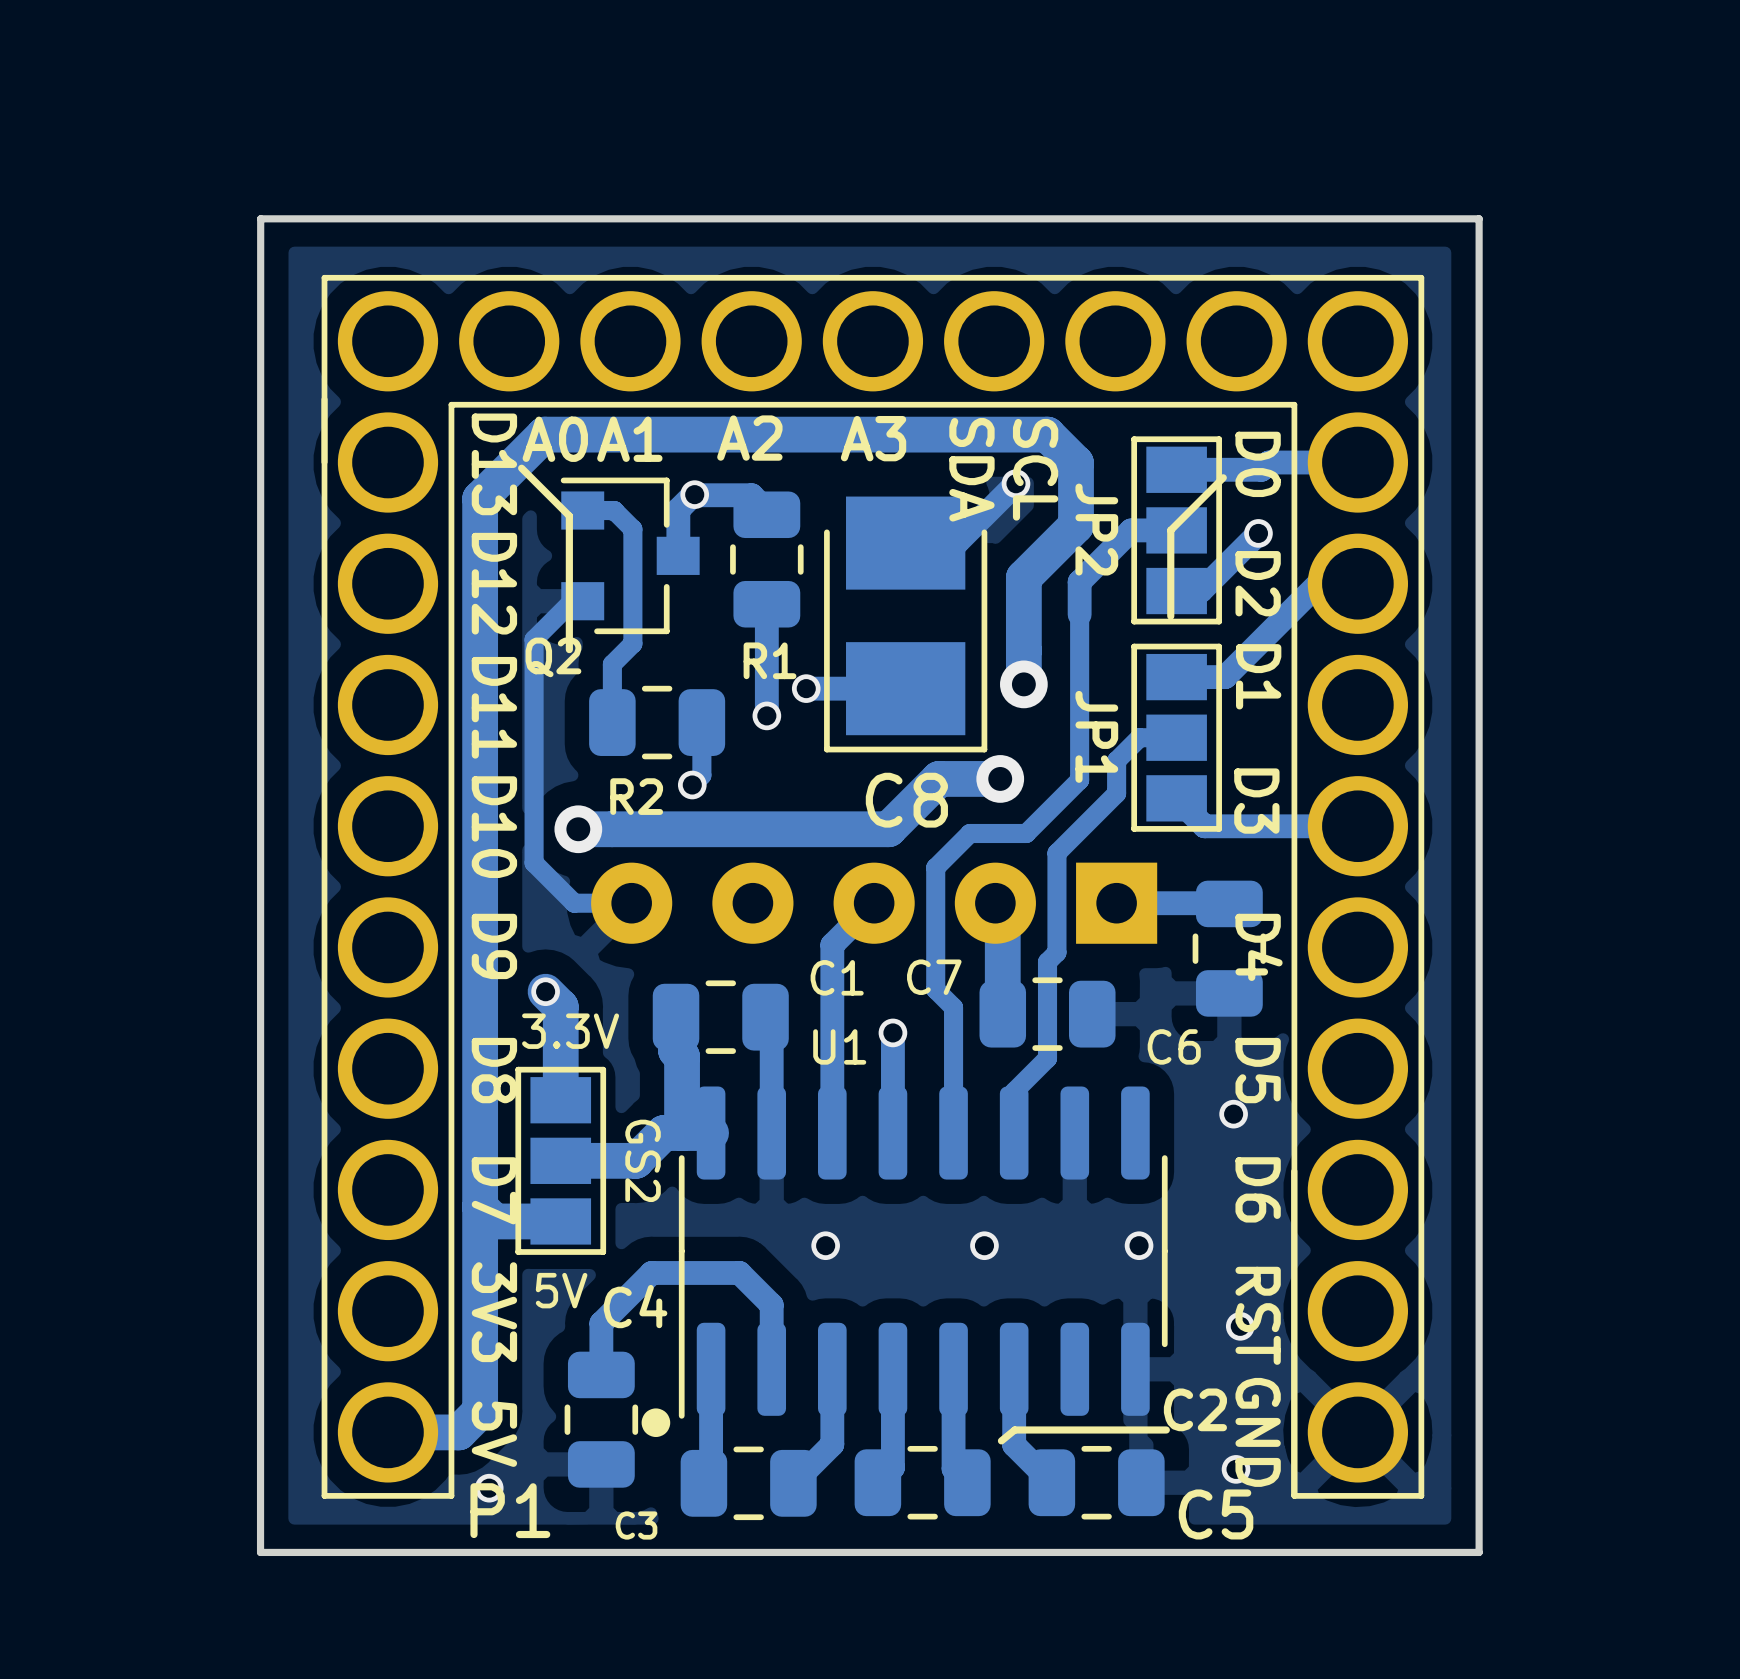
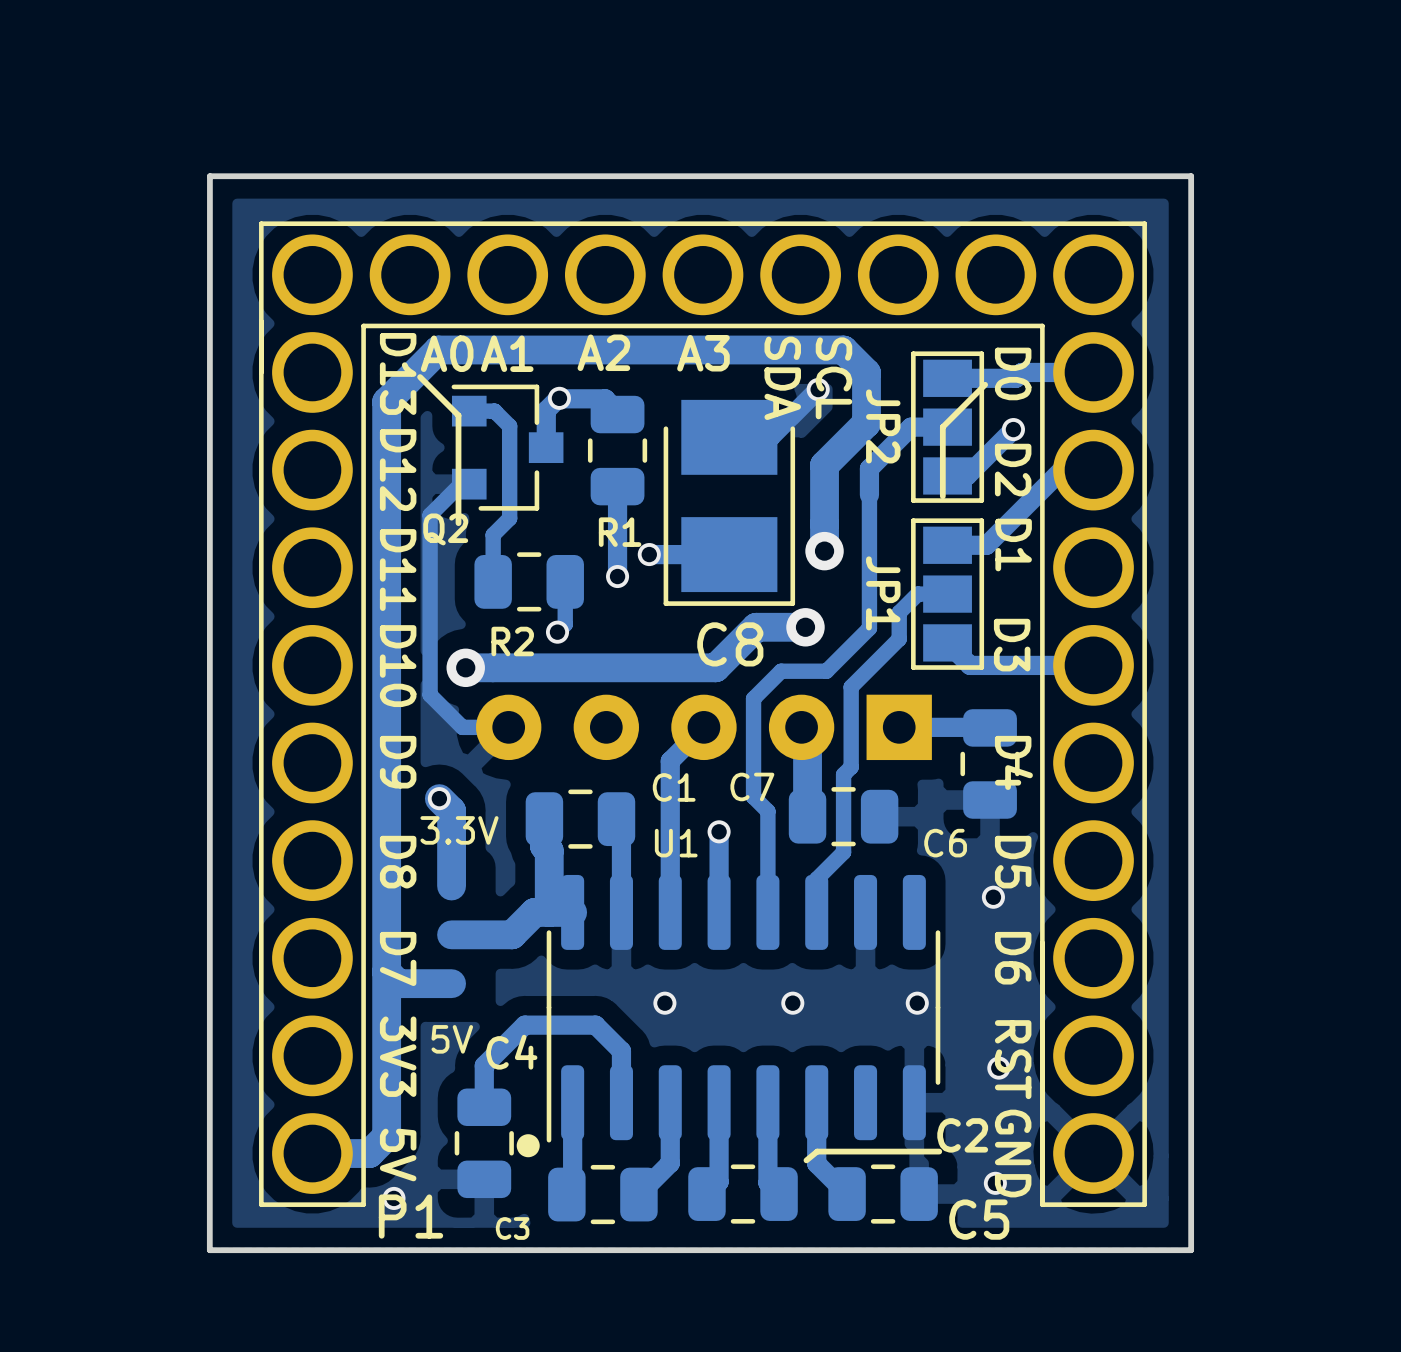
GS2: (560, 1160) -> none

